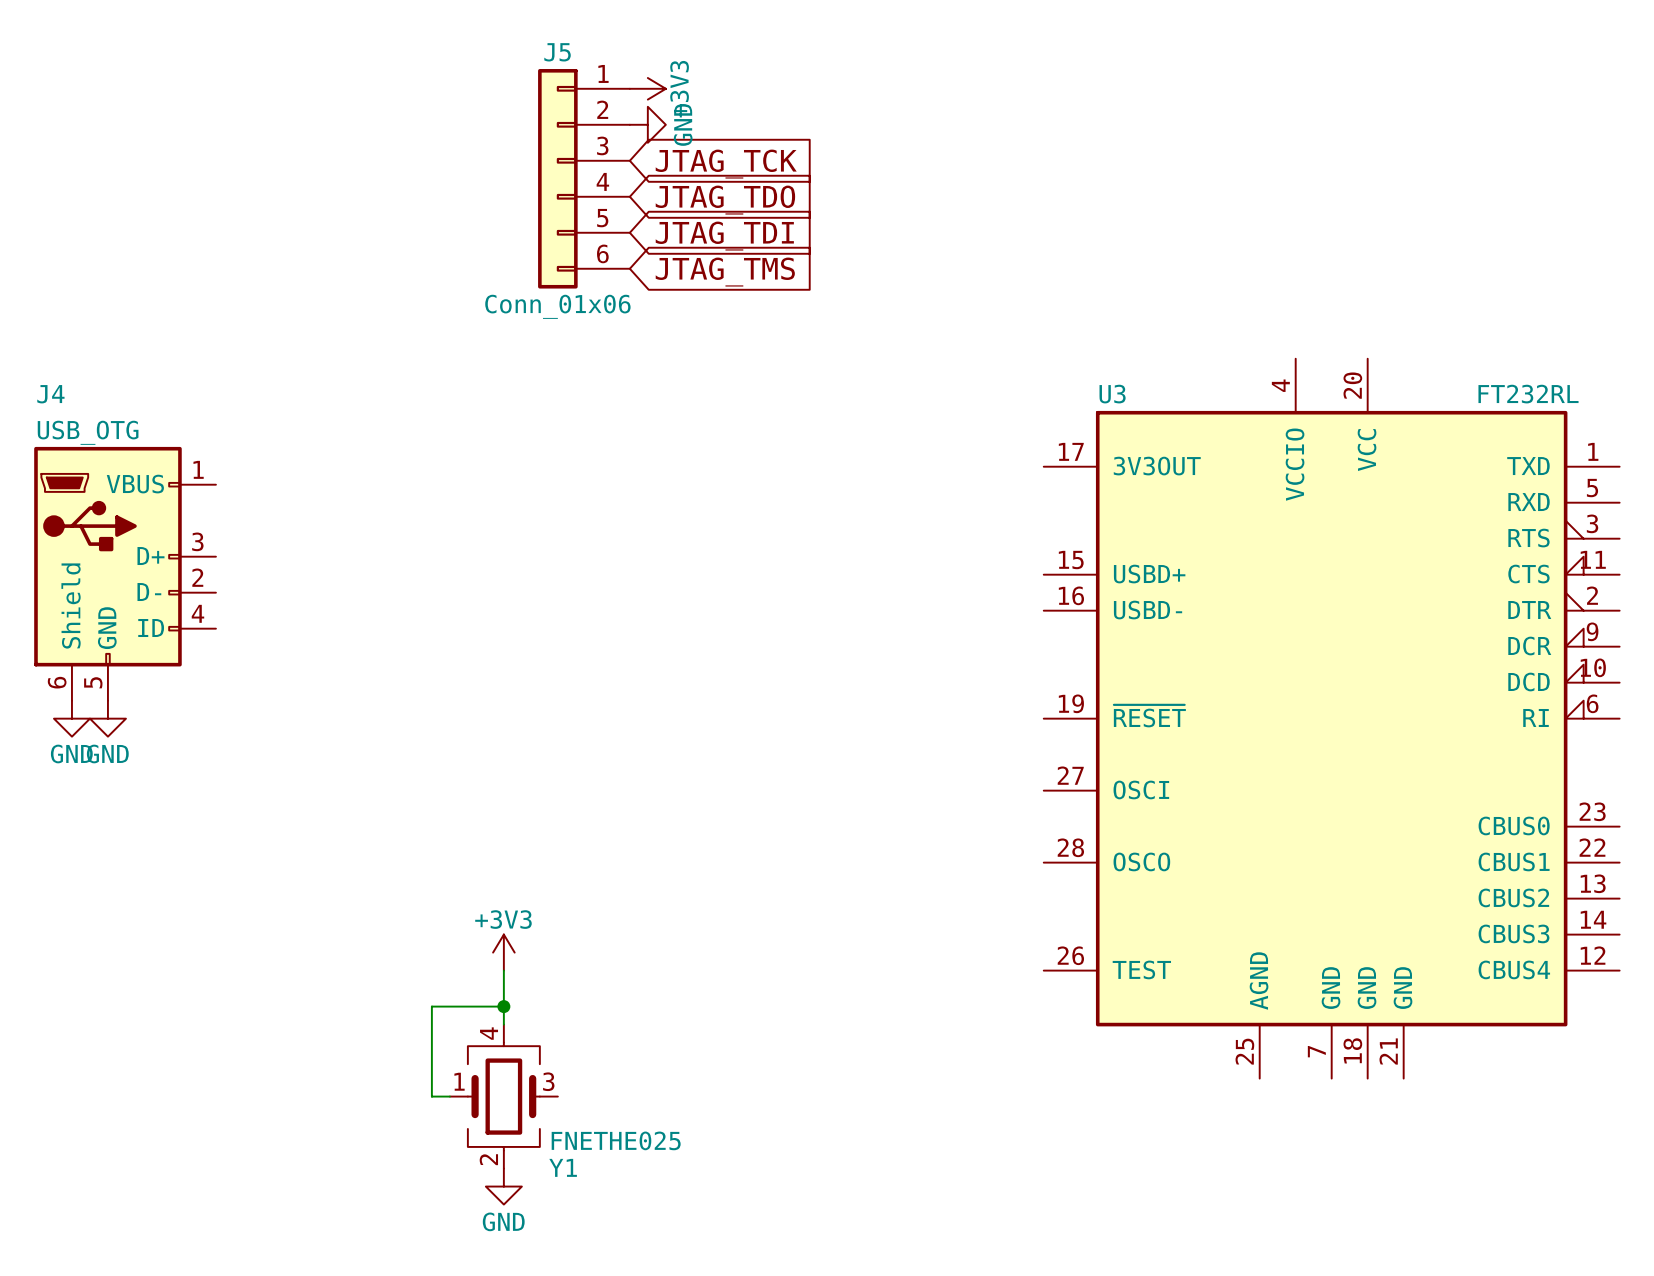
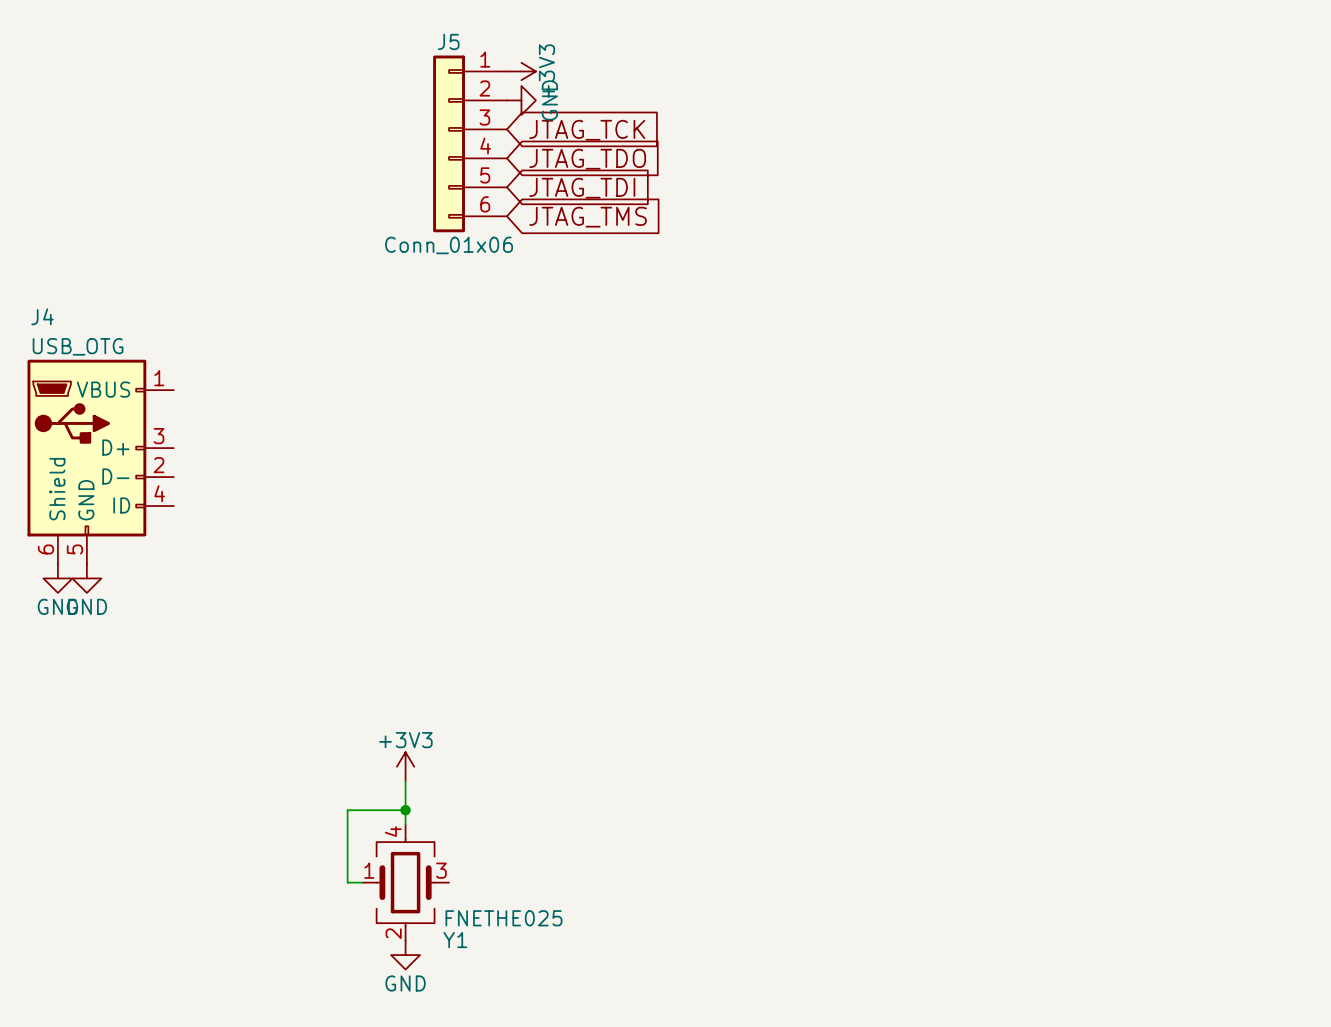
U3: FT232RL (1331, 718) -> none

